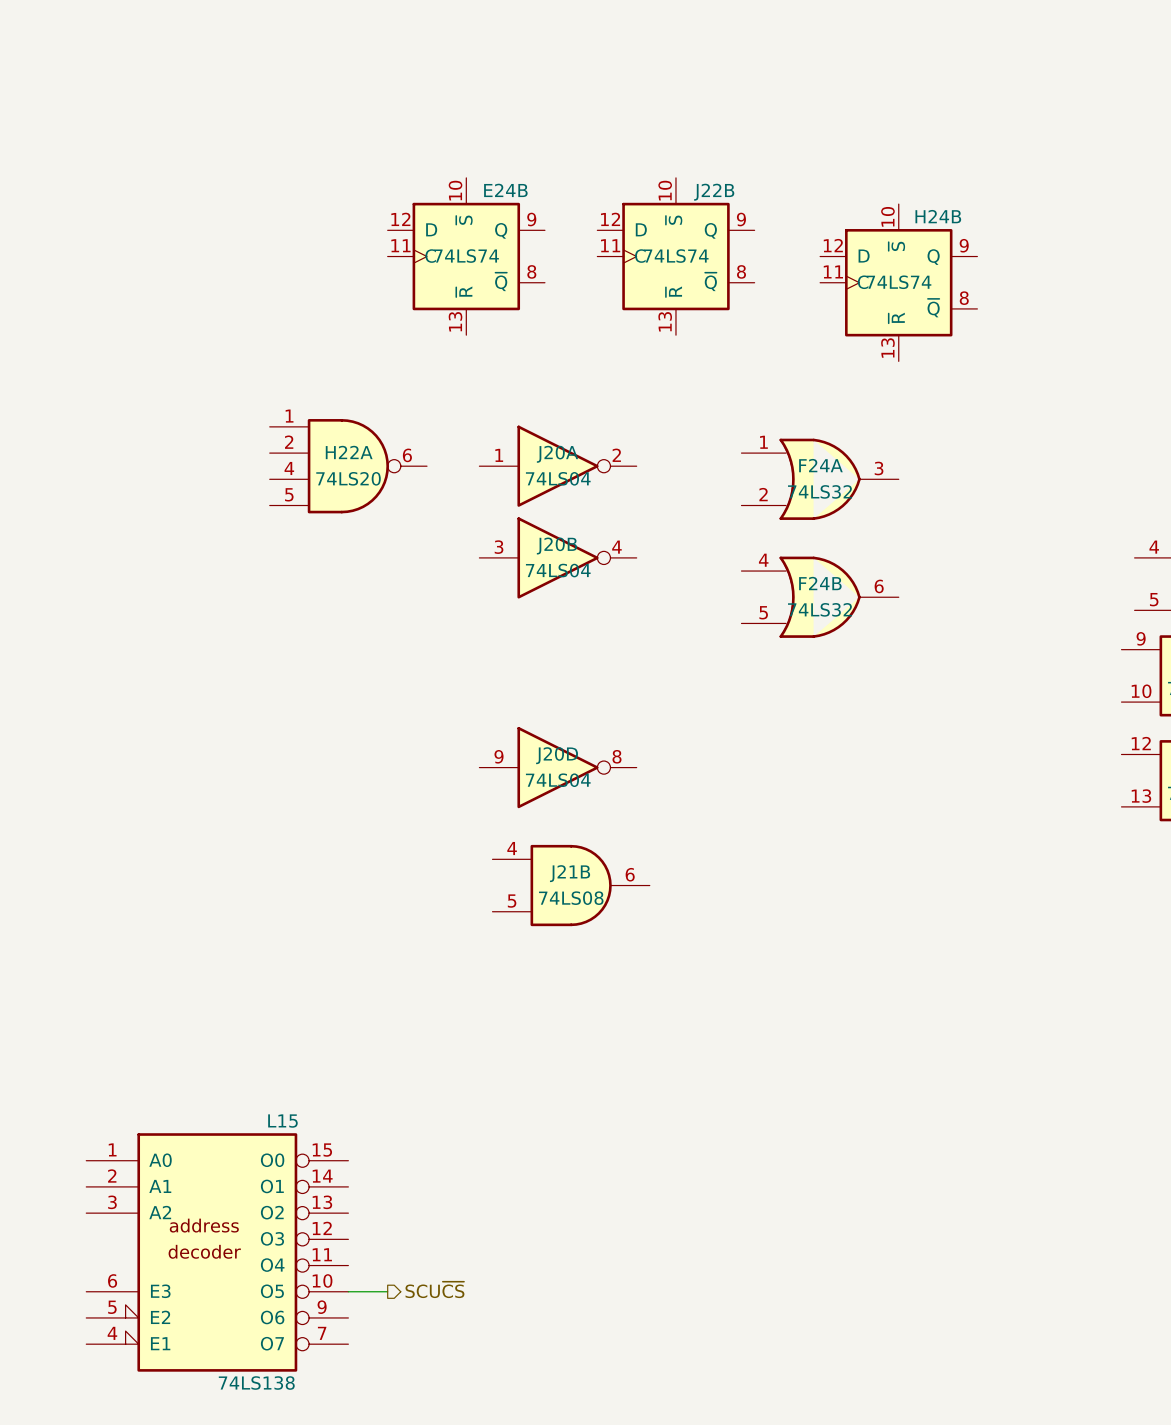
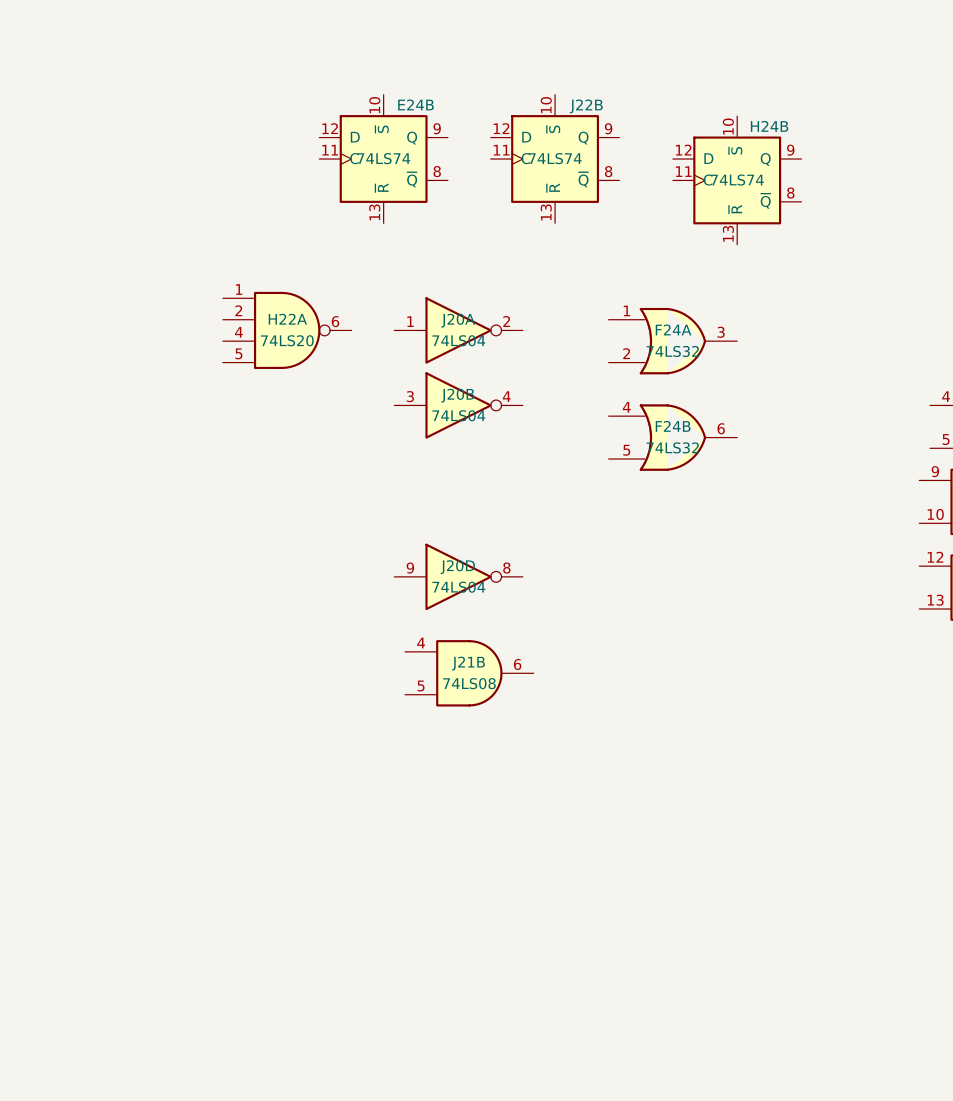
L15: 74LS138 (217, 1252) -> none
hierarchical label: SCU~{CS} (434, 1289) -> none
wire: (348, 1291) (387, 1291) -> none

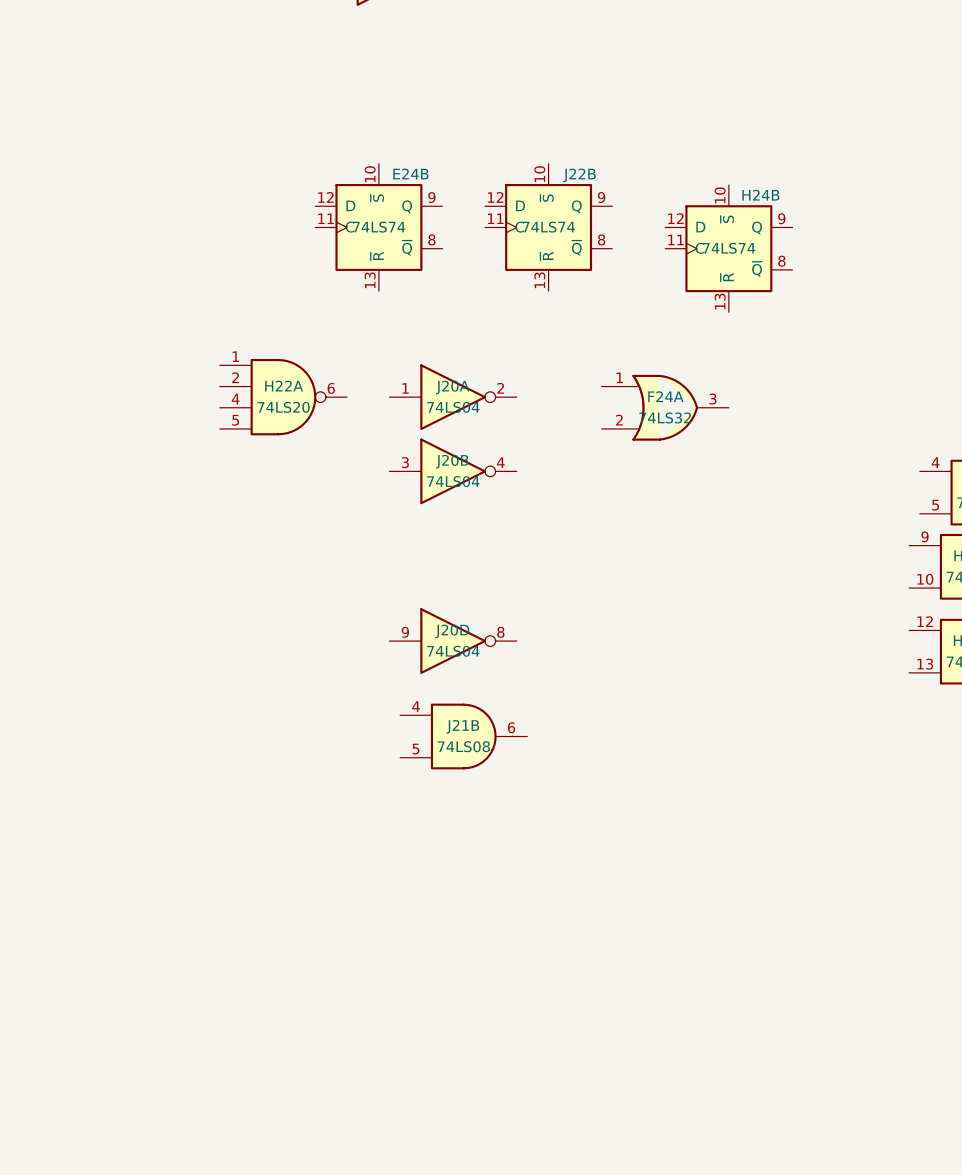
F24B: 74LS32 (672, 437) -> none

